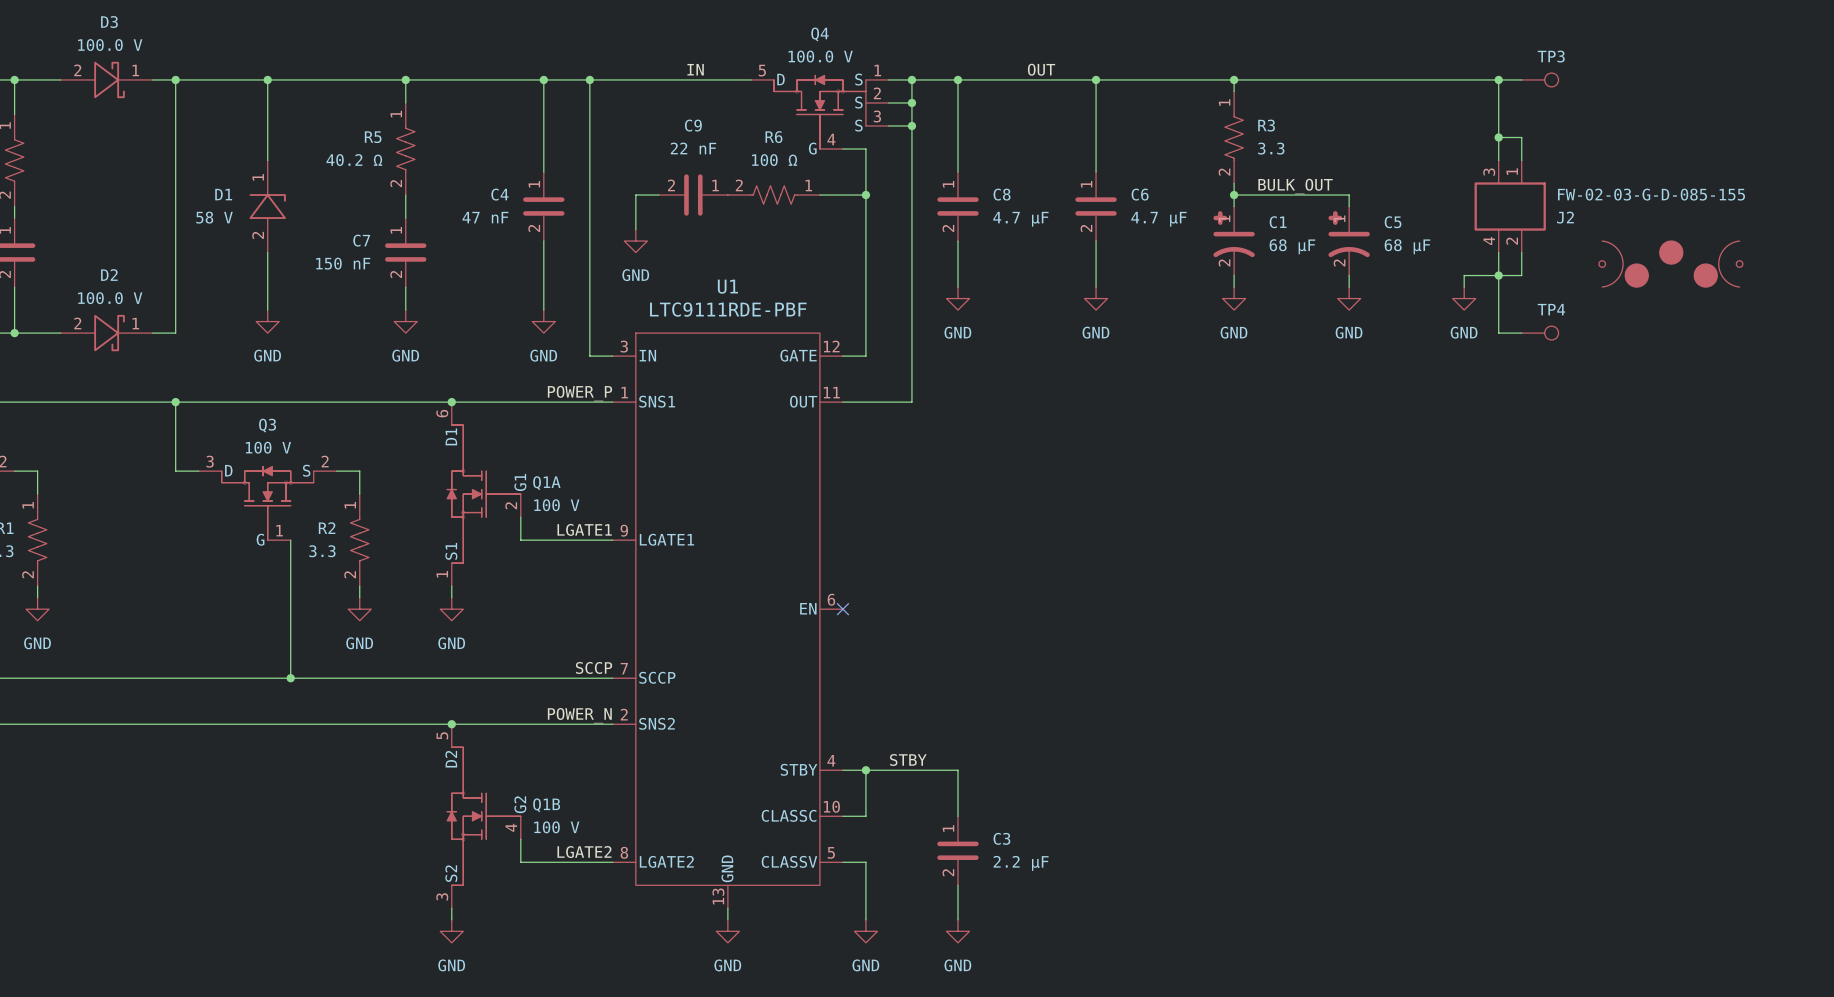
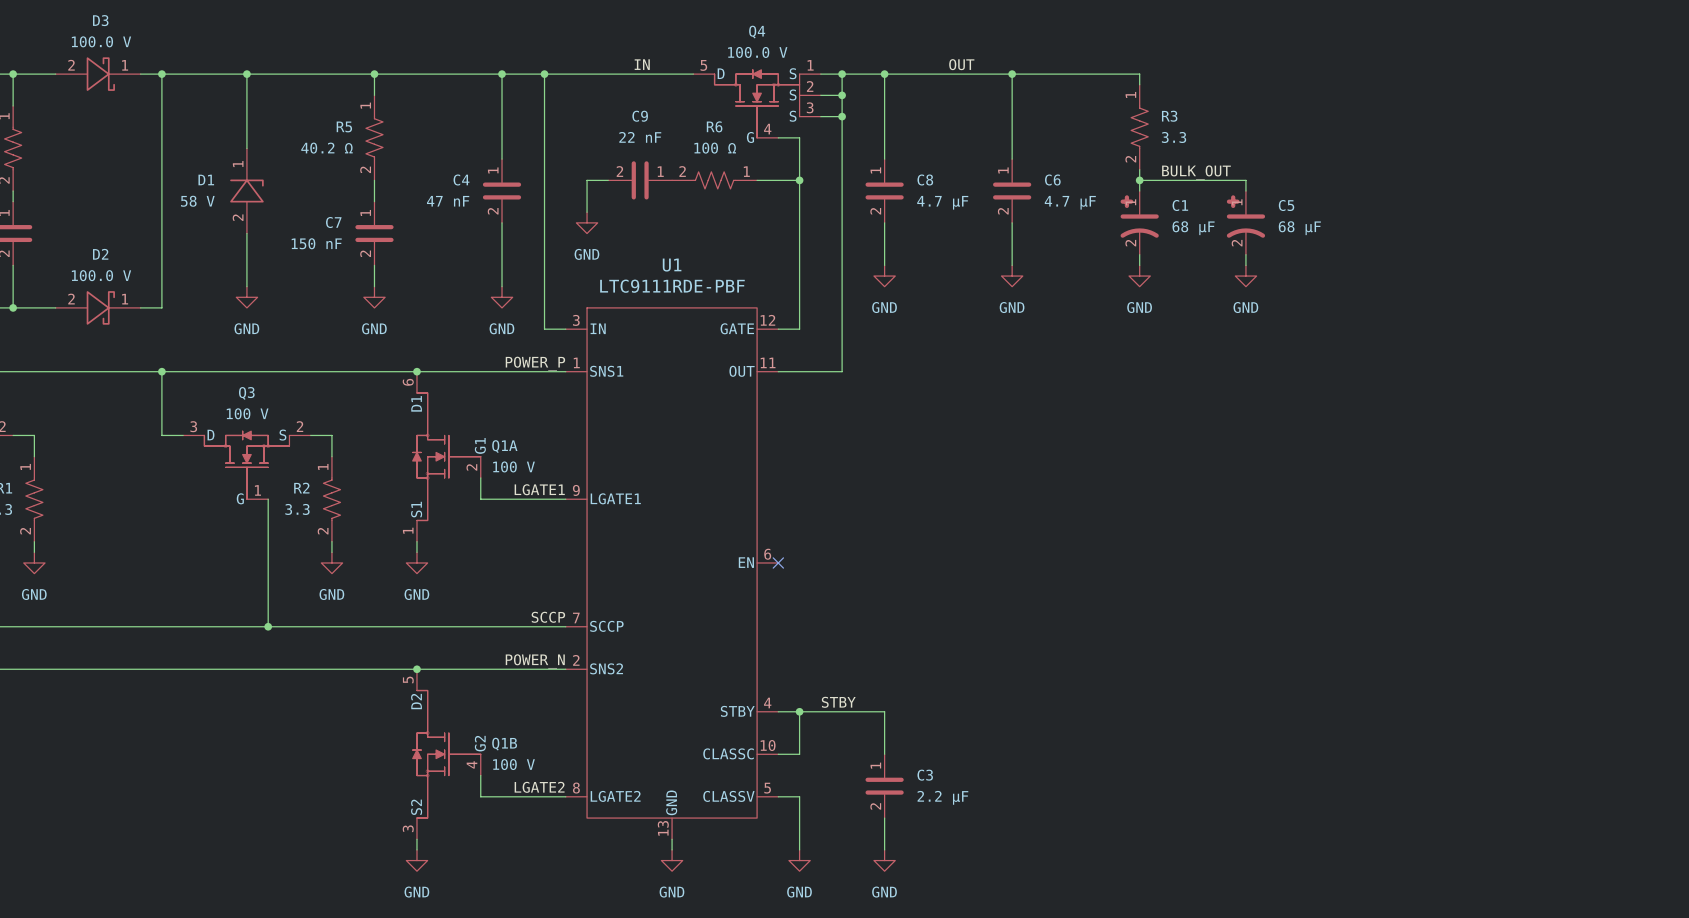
wire: (1234, 79) (1521, 79) -> none
junction: (1234, 79) -> none
wire: (1498, 79) (1498, 160) -> none
junction: (1498, 79) -> none
TP3: (1540, 79) -> none
wire: (1498, 137) (1521, 137) (1521, 160) -> none
junction: (1498, 137) -> none
J2: FW-02-03-G-D-085-155 (1510, 206) -> none
wire: (1498, 252) (1498, 333) (1521, 333) -> none
wire: (1521, 252) (1521, 275) (1464, 275) (1464, 287) -> none
part: (1670, 264) -> none
junction: (1498, 275) -> none
power symbol: GND (1464, 298) -> none
TP4: (1540, 333) -> none

